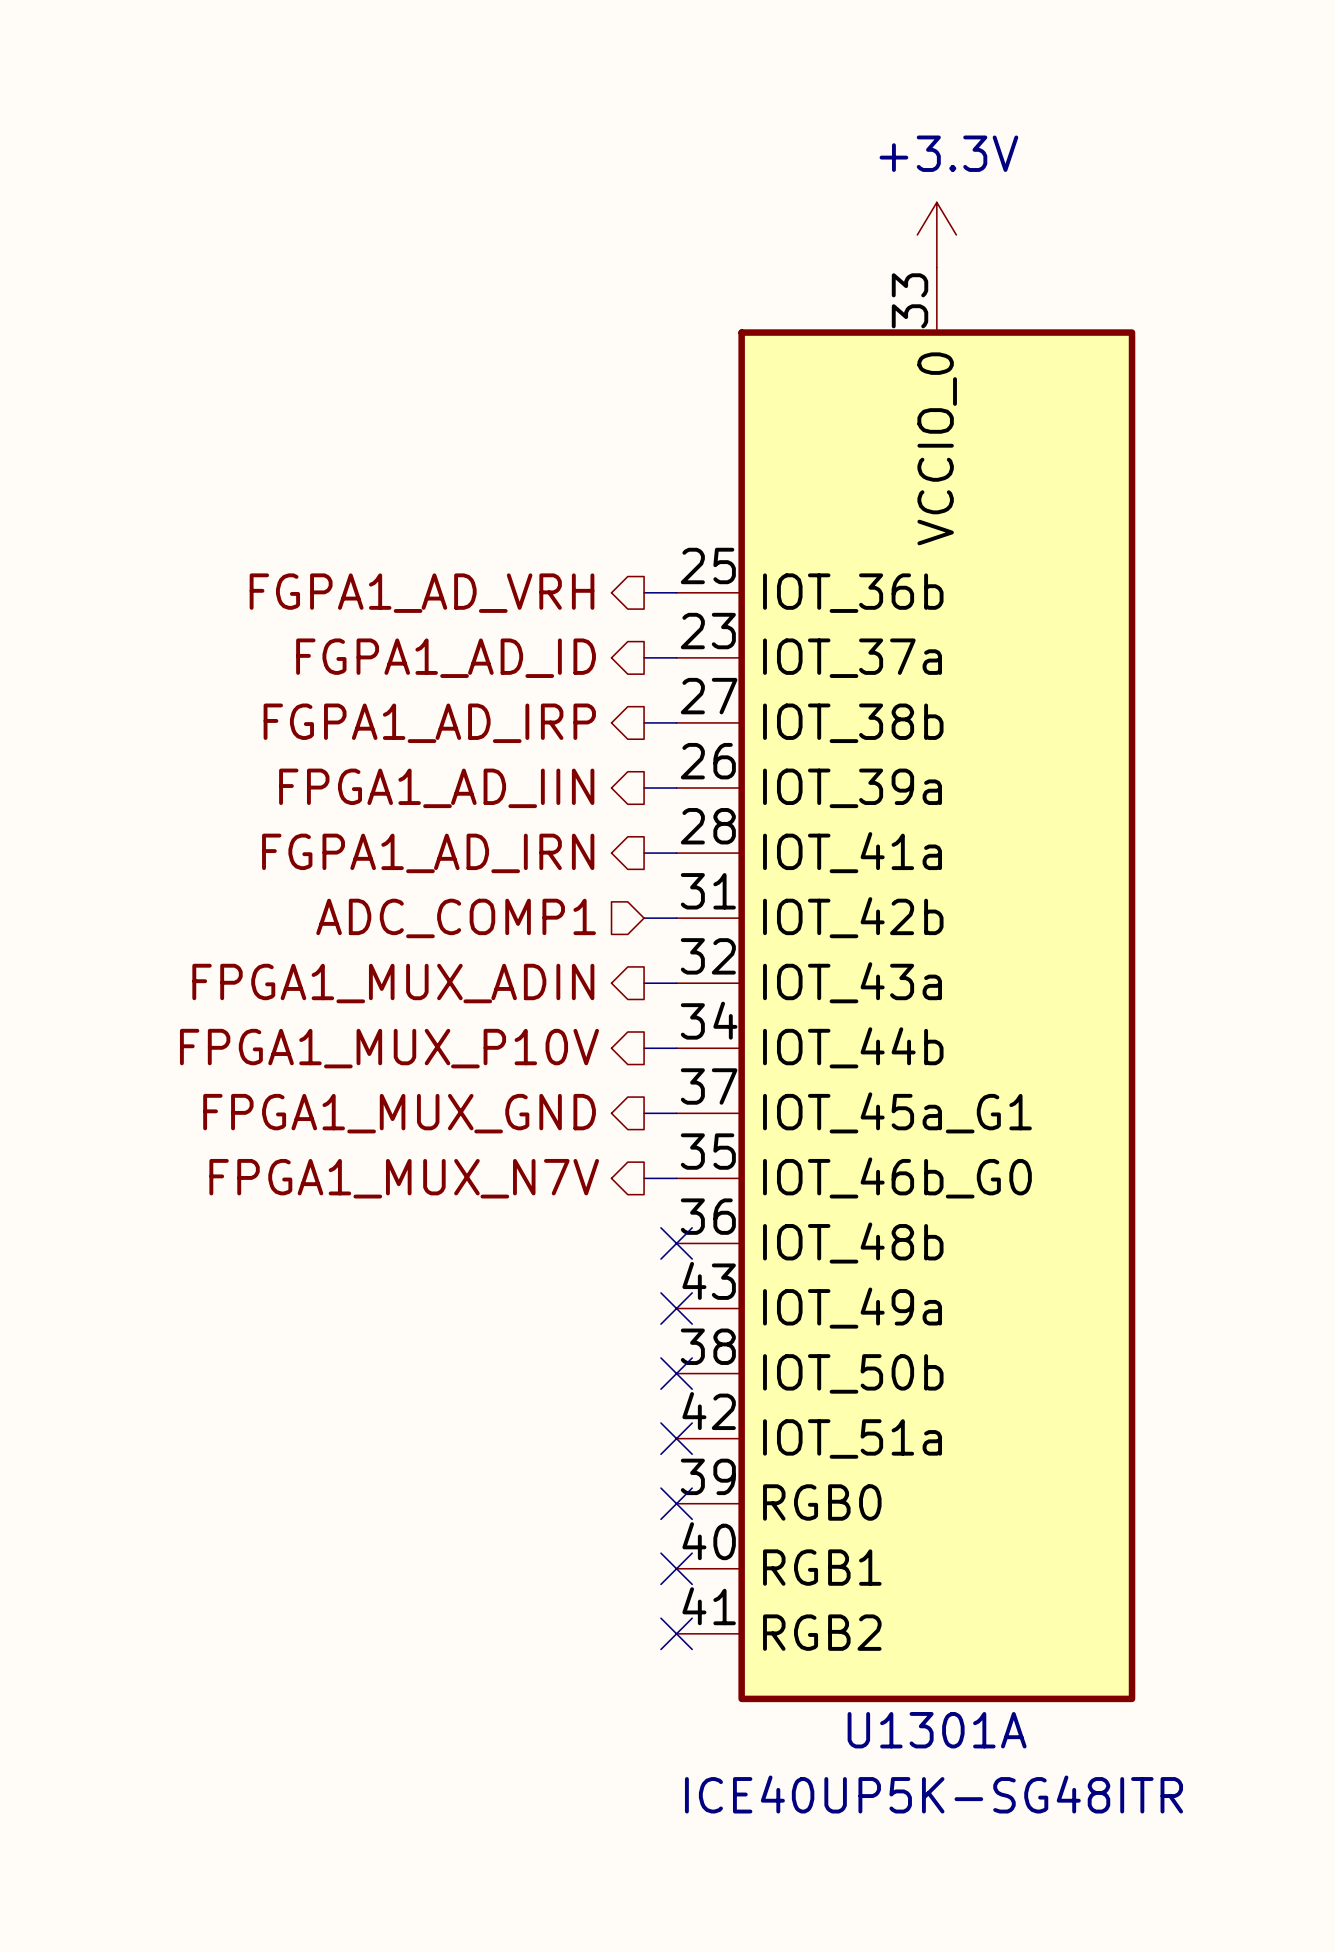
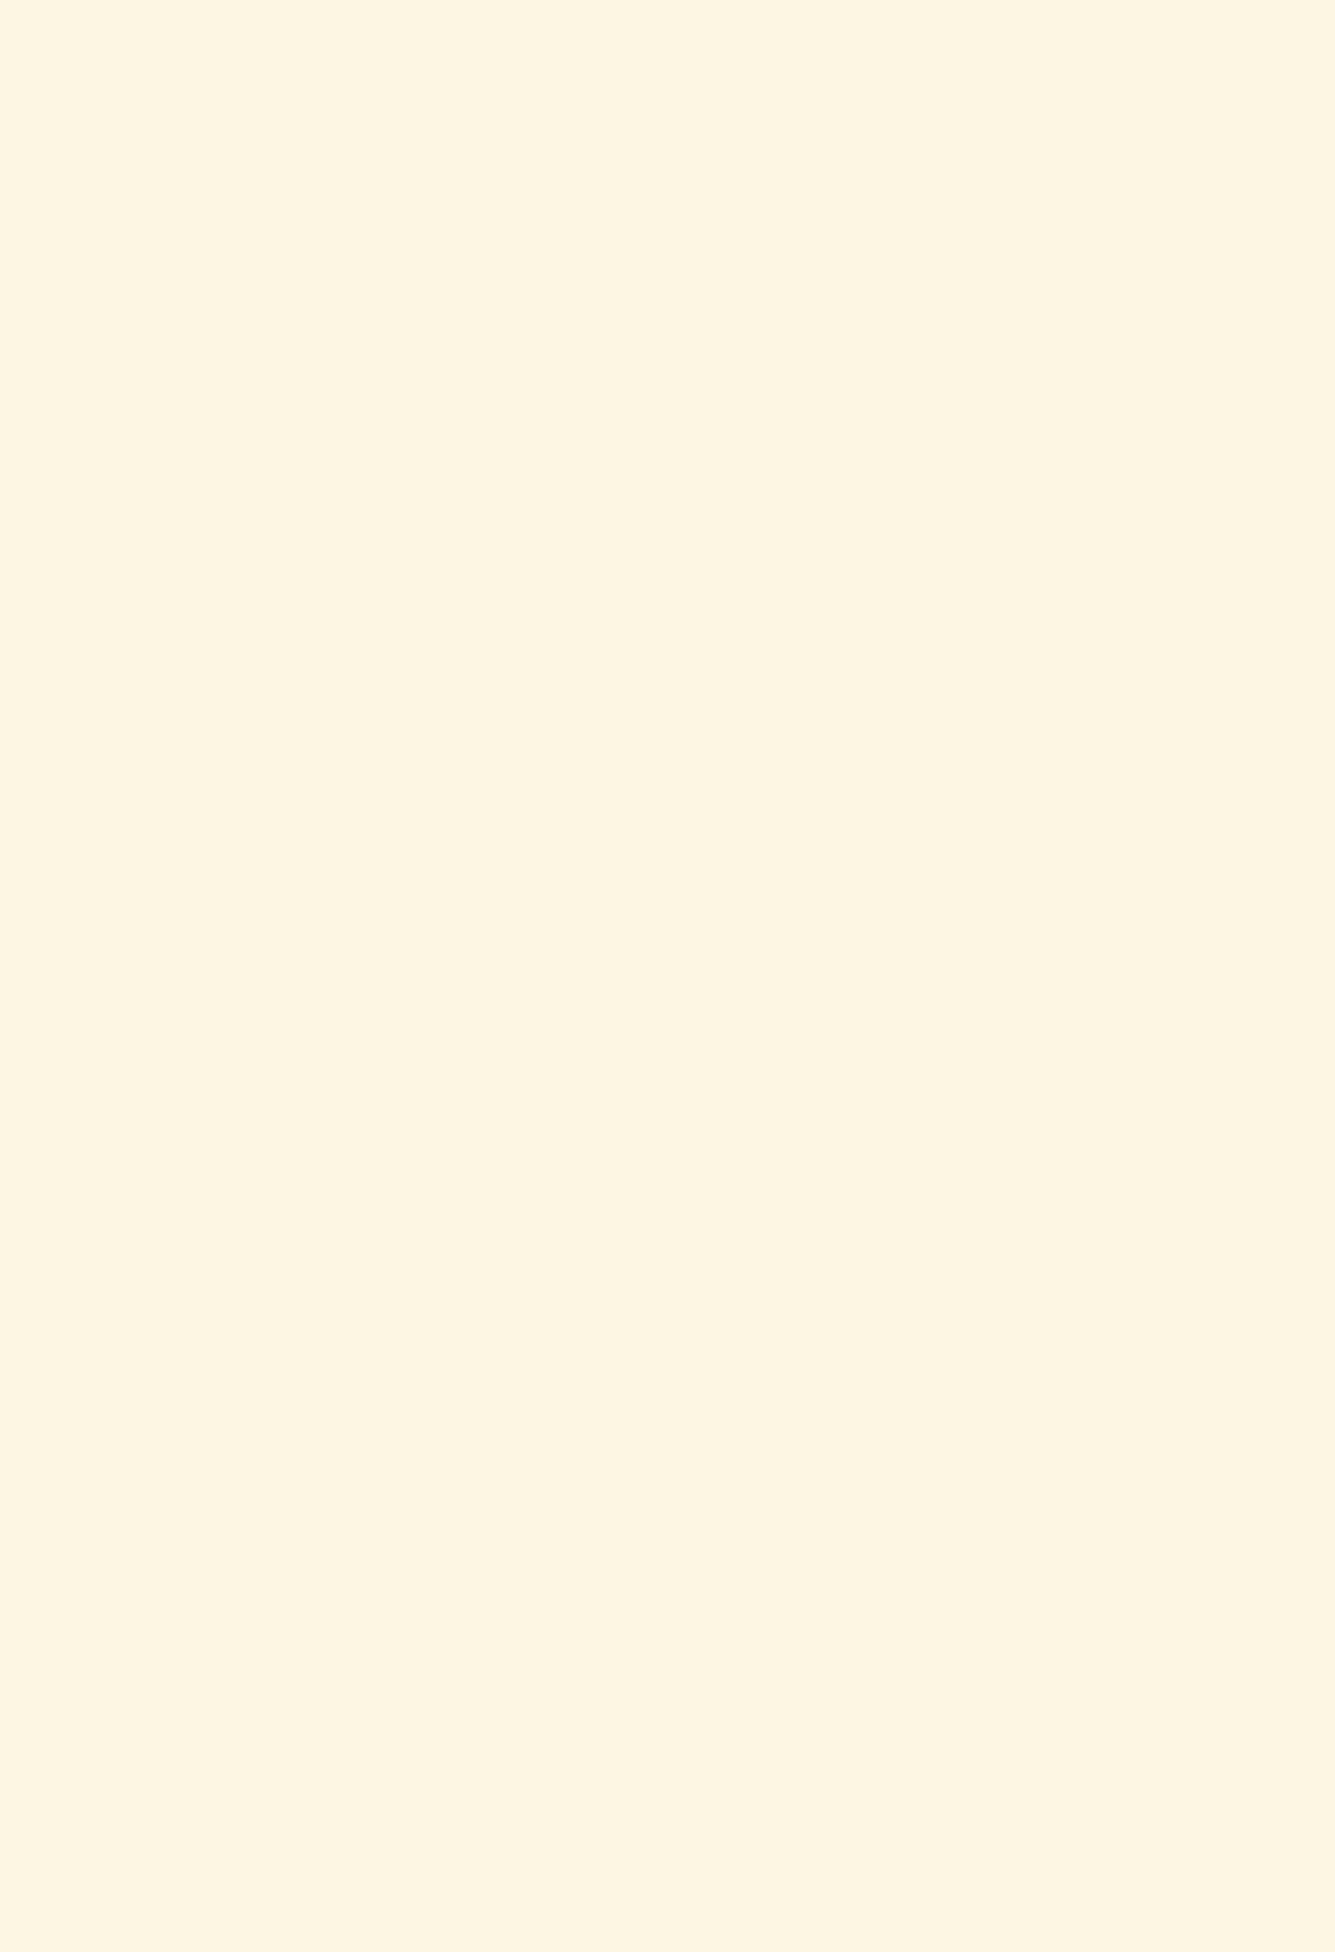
power symbol: +3.3V (936, 234) -> none
wire: (644, 592) (676, 592) -> none
hierarchical label: FGPA1_AD_VRH (422, 593) -> none
wire: (644, 657) (676, 657) -> none
hierarchical label: FGPA1_AD_ID (446, 658) -> none
wire: (644, 722) (676, 722) -> none
hierarchical label: FGPA1_AD_IRP (429, 723) -> none
hierarchical label: FPGA1_AD_IIN (436, 788) -> none
wire: (644, 788) (676, 788) -> none
hierarchical label: FGPA1_AD_IRN (428, 853) -> none
wire: (644, 853) (676, 853) -> none
hierarchical label: ADC_COMP1 (456, 918) -> none
wire: (644, 918) (676, 918) -> none
hierarchical label: FPGA1_MUX_ADIN (393, 983) -> none
wire: (644, 983) (676, 983) -> none
U1301A: ICE40UP5K-SG48ITR (905, 984) -> none
hierarchical label: FPGA1_MUX_P10V (389, 1048) -> none
wire: (644, 1048) (676, 1048) -> none
hierarchical label: FPGA1_MUX_GND (399, 1113) -> none
wire: (644, 1113) (676, 1113) -> none
hierarchical label: FPGA1_MUX_N7V (404, 1178) -> none
wire: (644, 1178) (676, 1178) -> none
no-connect mark: (676, 1243) -> none
no-connect mark: (676, 1308) -> none
no-connect mark: (676, 1373) -> none
no-connect mark: (676, 1438) -> none
no-connect mark: (676, 1503) -> none
no-connect mark: (676, 1568) -> none
no-connect mark: (676, 1633) -> none

